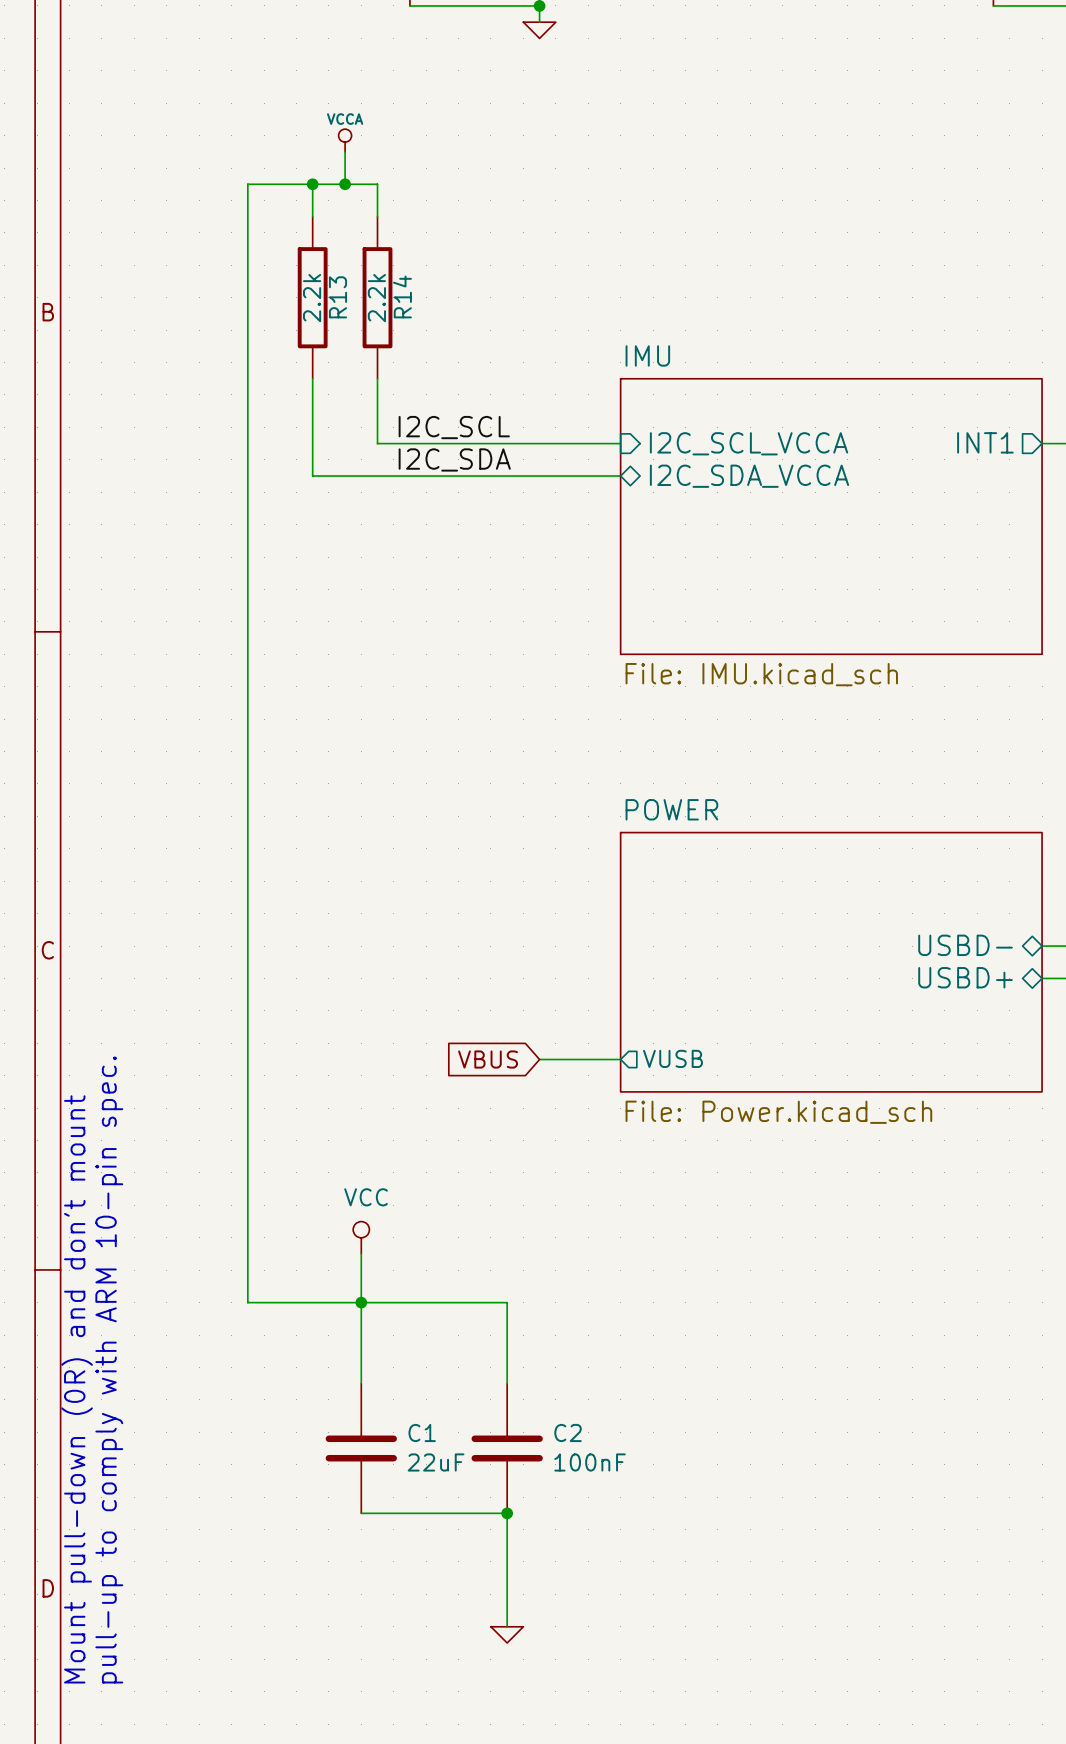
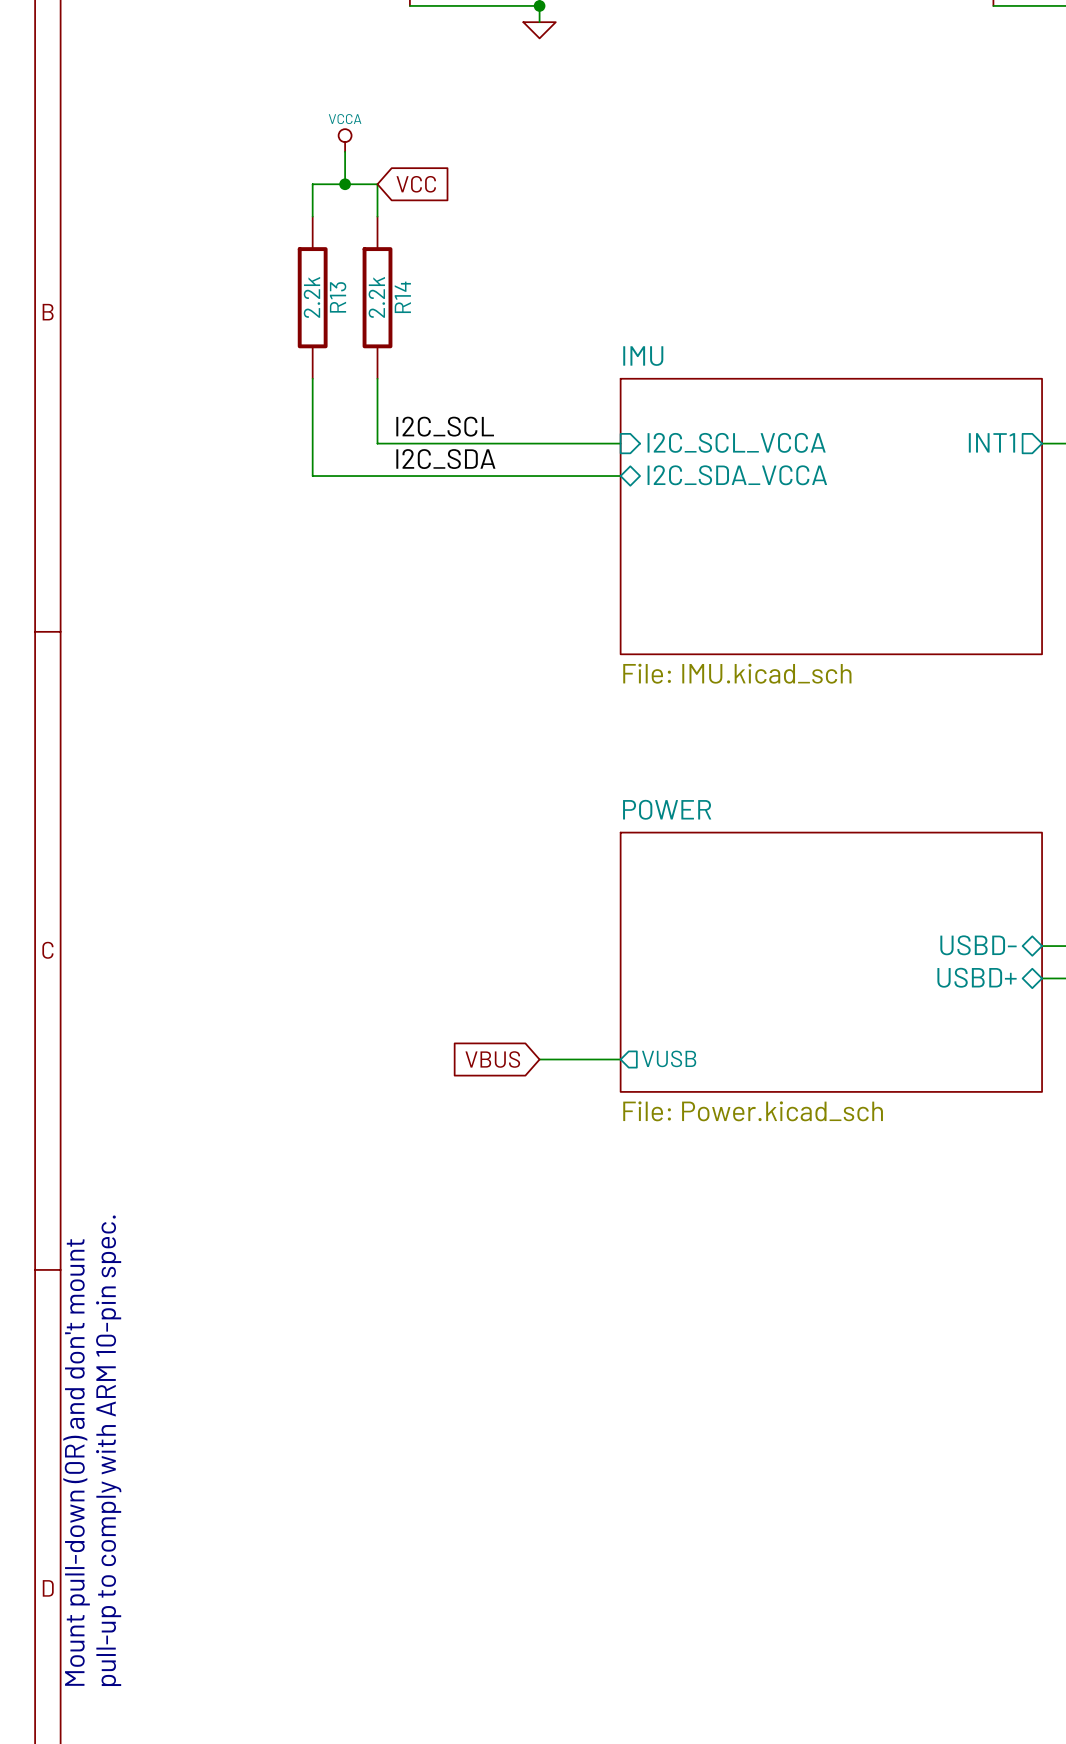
wire: (312, 184) (247, 184) (247, 1302) (507, 1302) (507, 1383) -> none
junction: (312, 184) -> none
global label: none -> VCC (416, 184)
power symbol: VCC (361, 1237) -> none
wire: (361, 1254) (361, 1383) -> none
junction: (361, 1302) -> none
C1: 22uF (361, 1448) -> none
C2: 100nF (507, 1448) -> none
wire: (361, 1513) (507, 1513) (507, 1626) -> none
junction: (507, 1513) -> none
power symbol: (507, 1634) -> none

